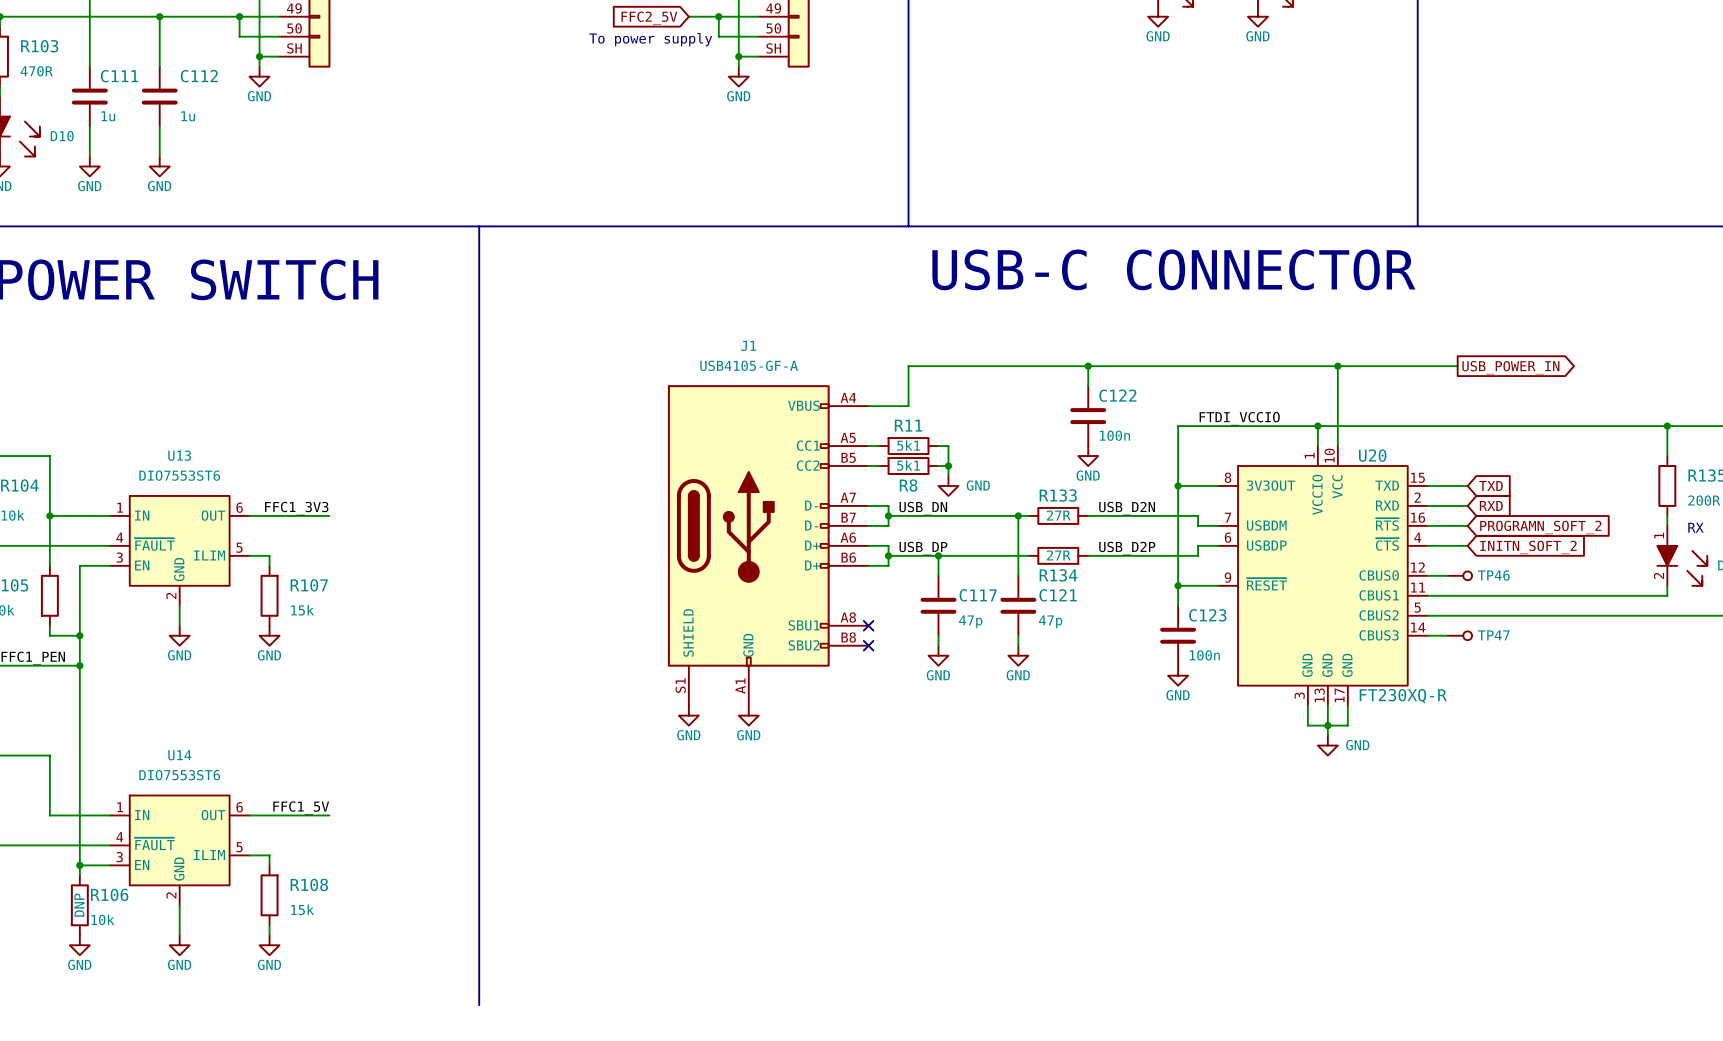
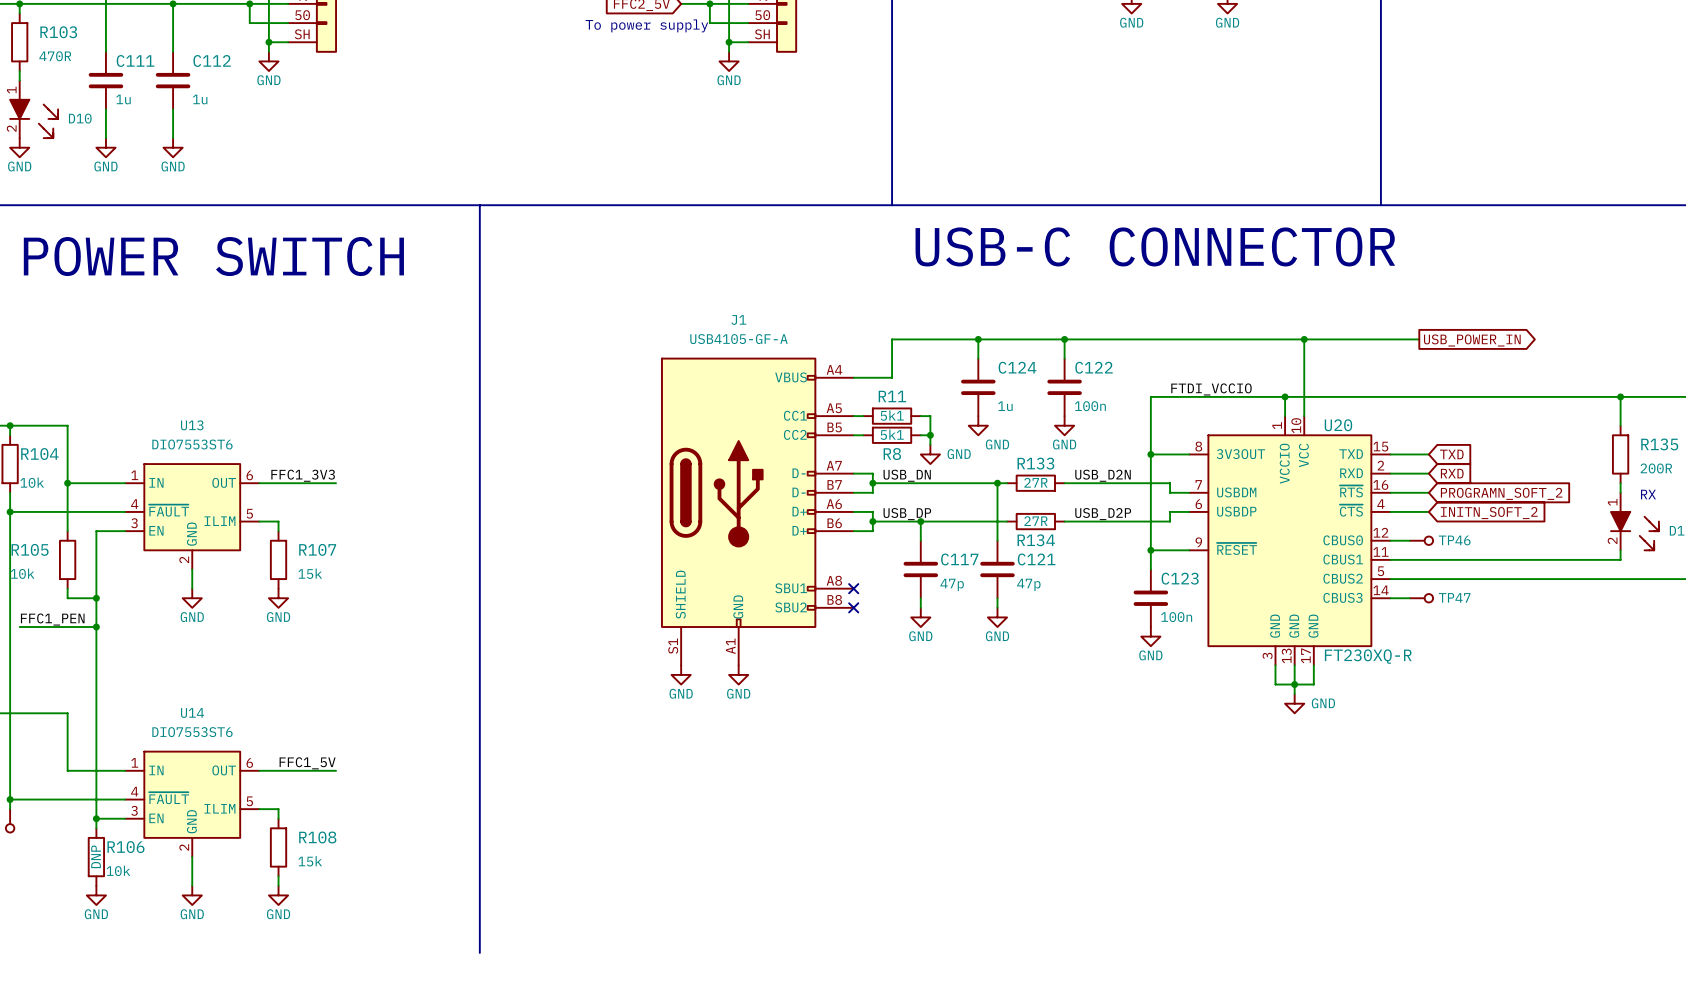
wire: none -> (978, 339) (978, 358)
junction: none -> (978, 339)
C124: none -> (978, 387)
power symbol: none -> GND (978, 425)

